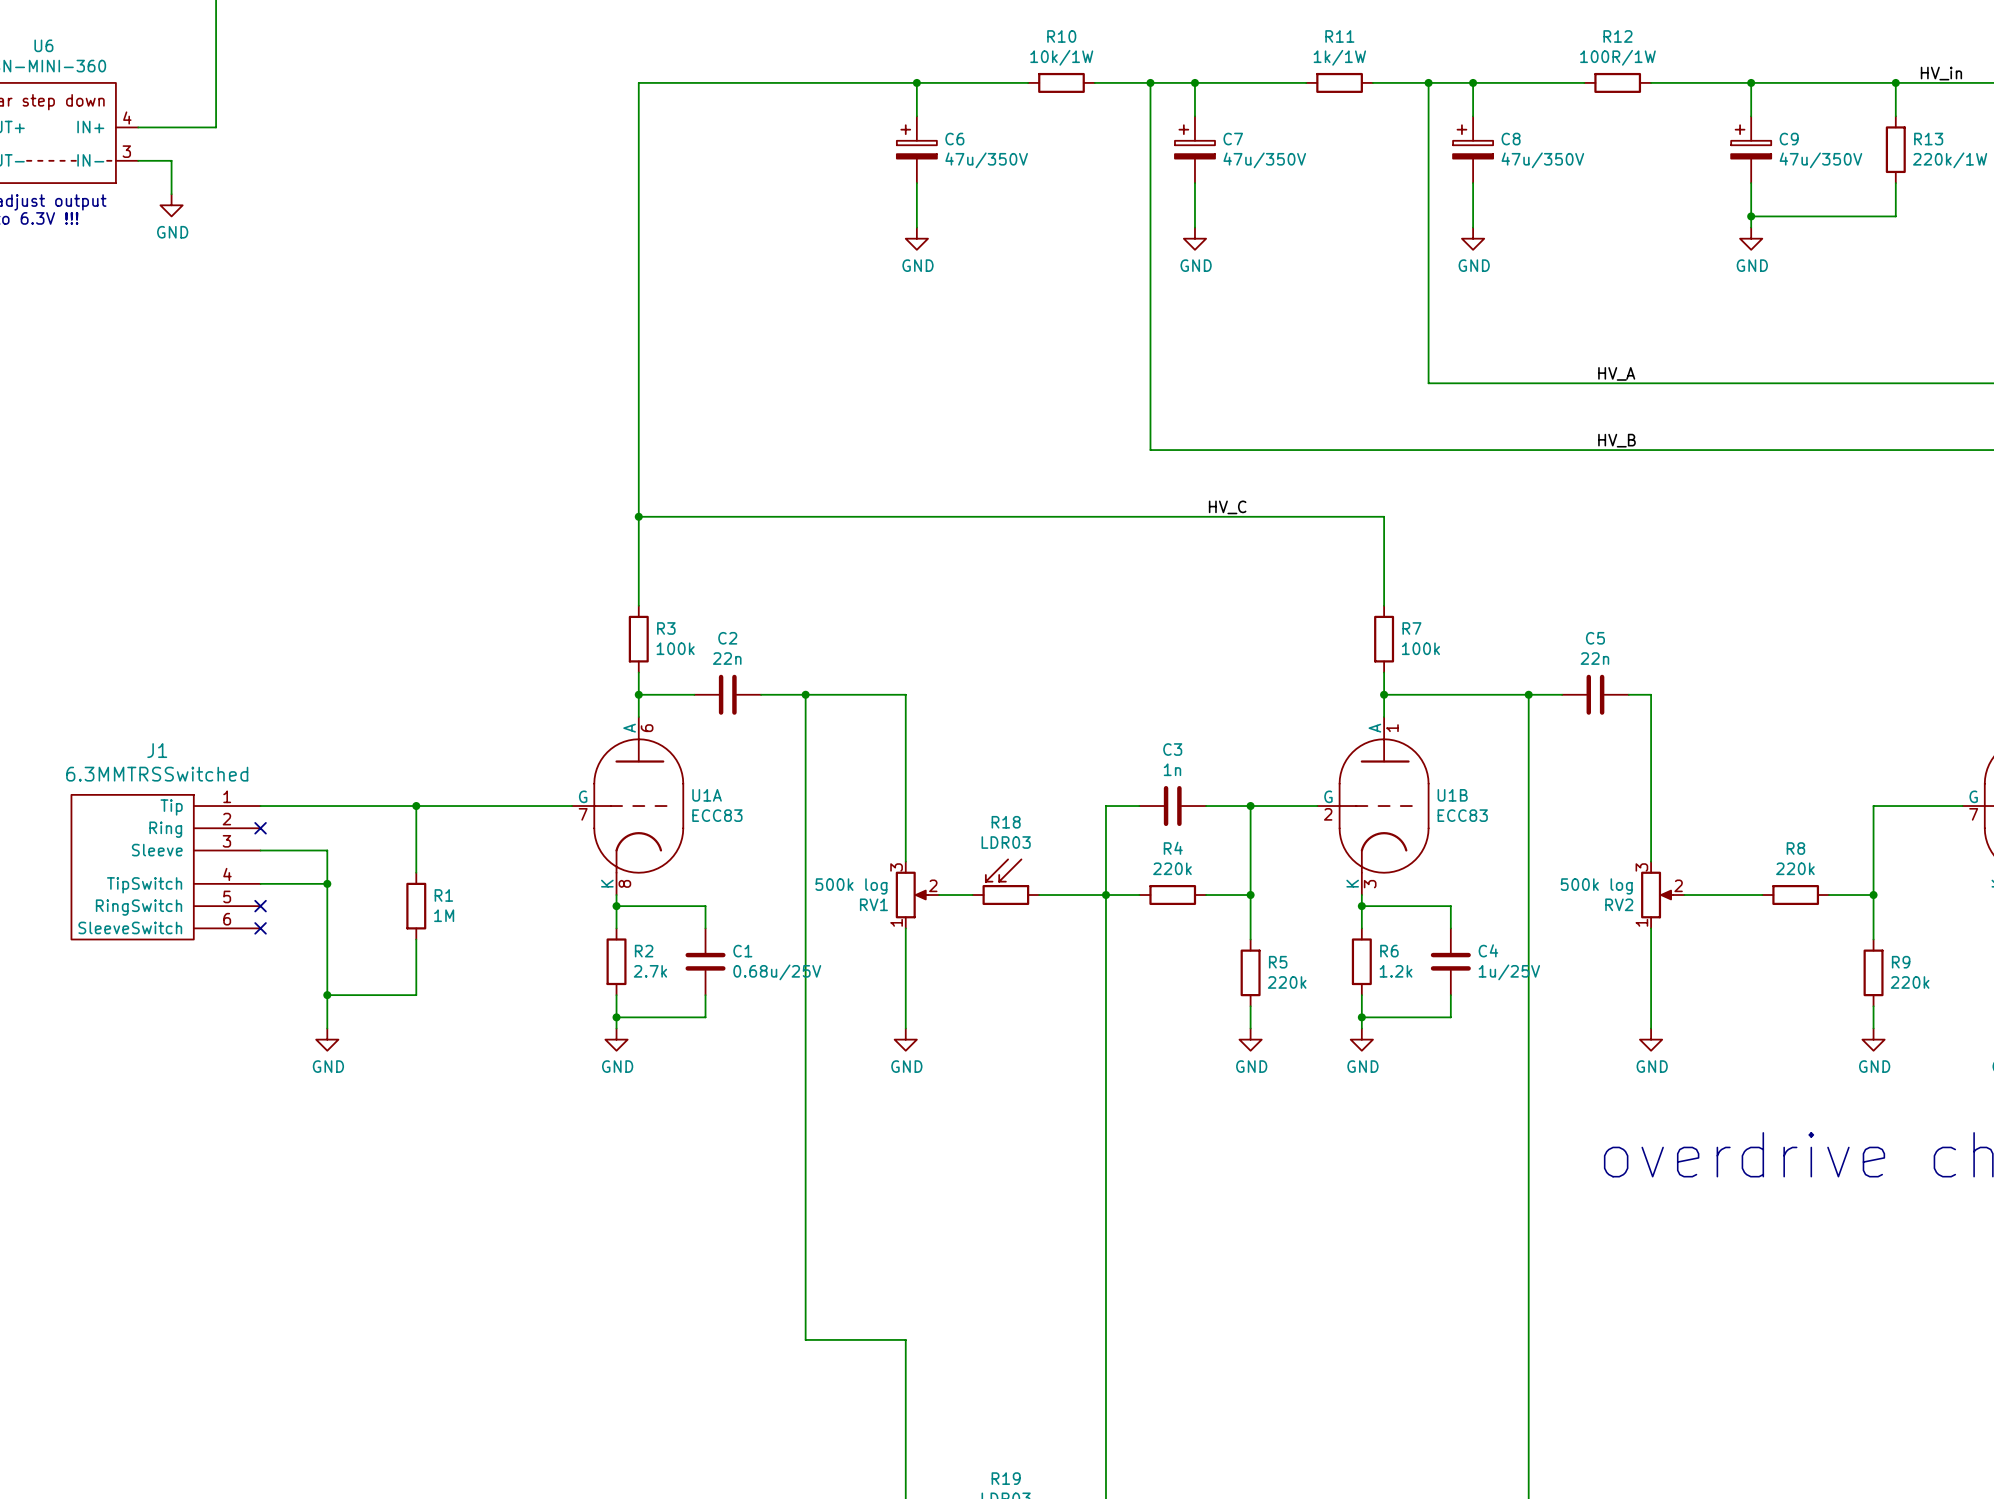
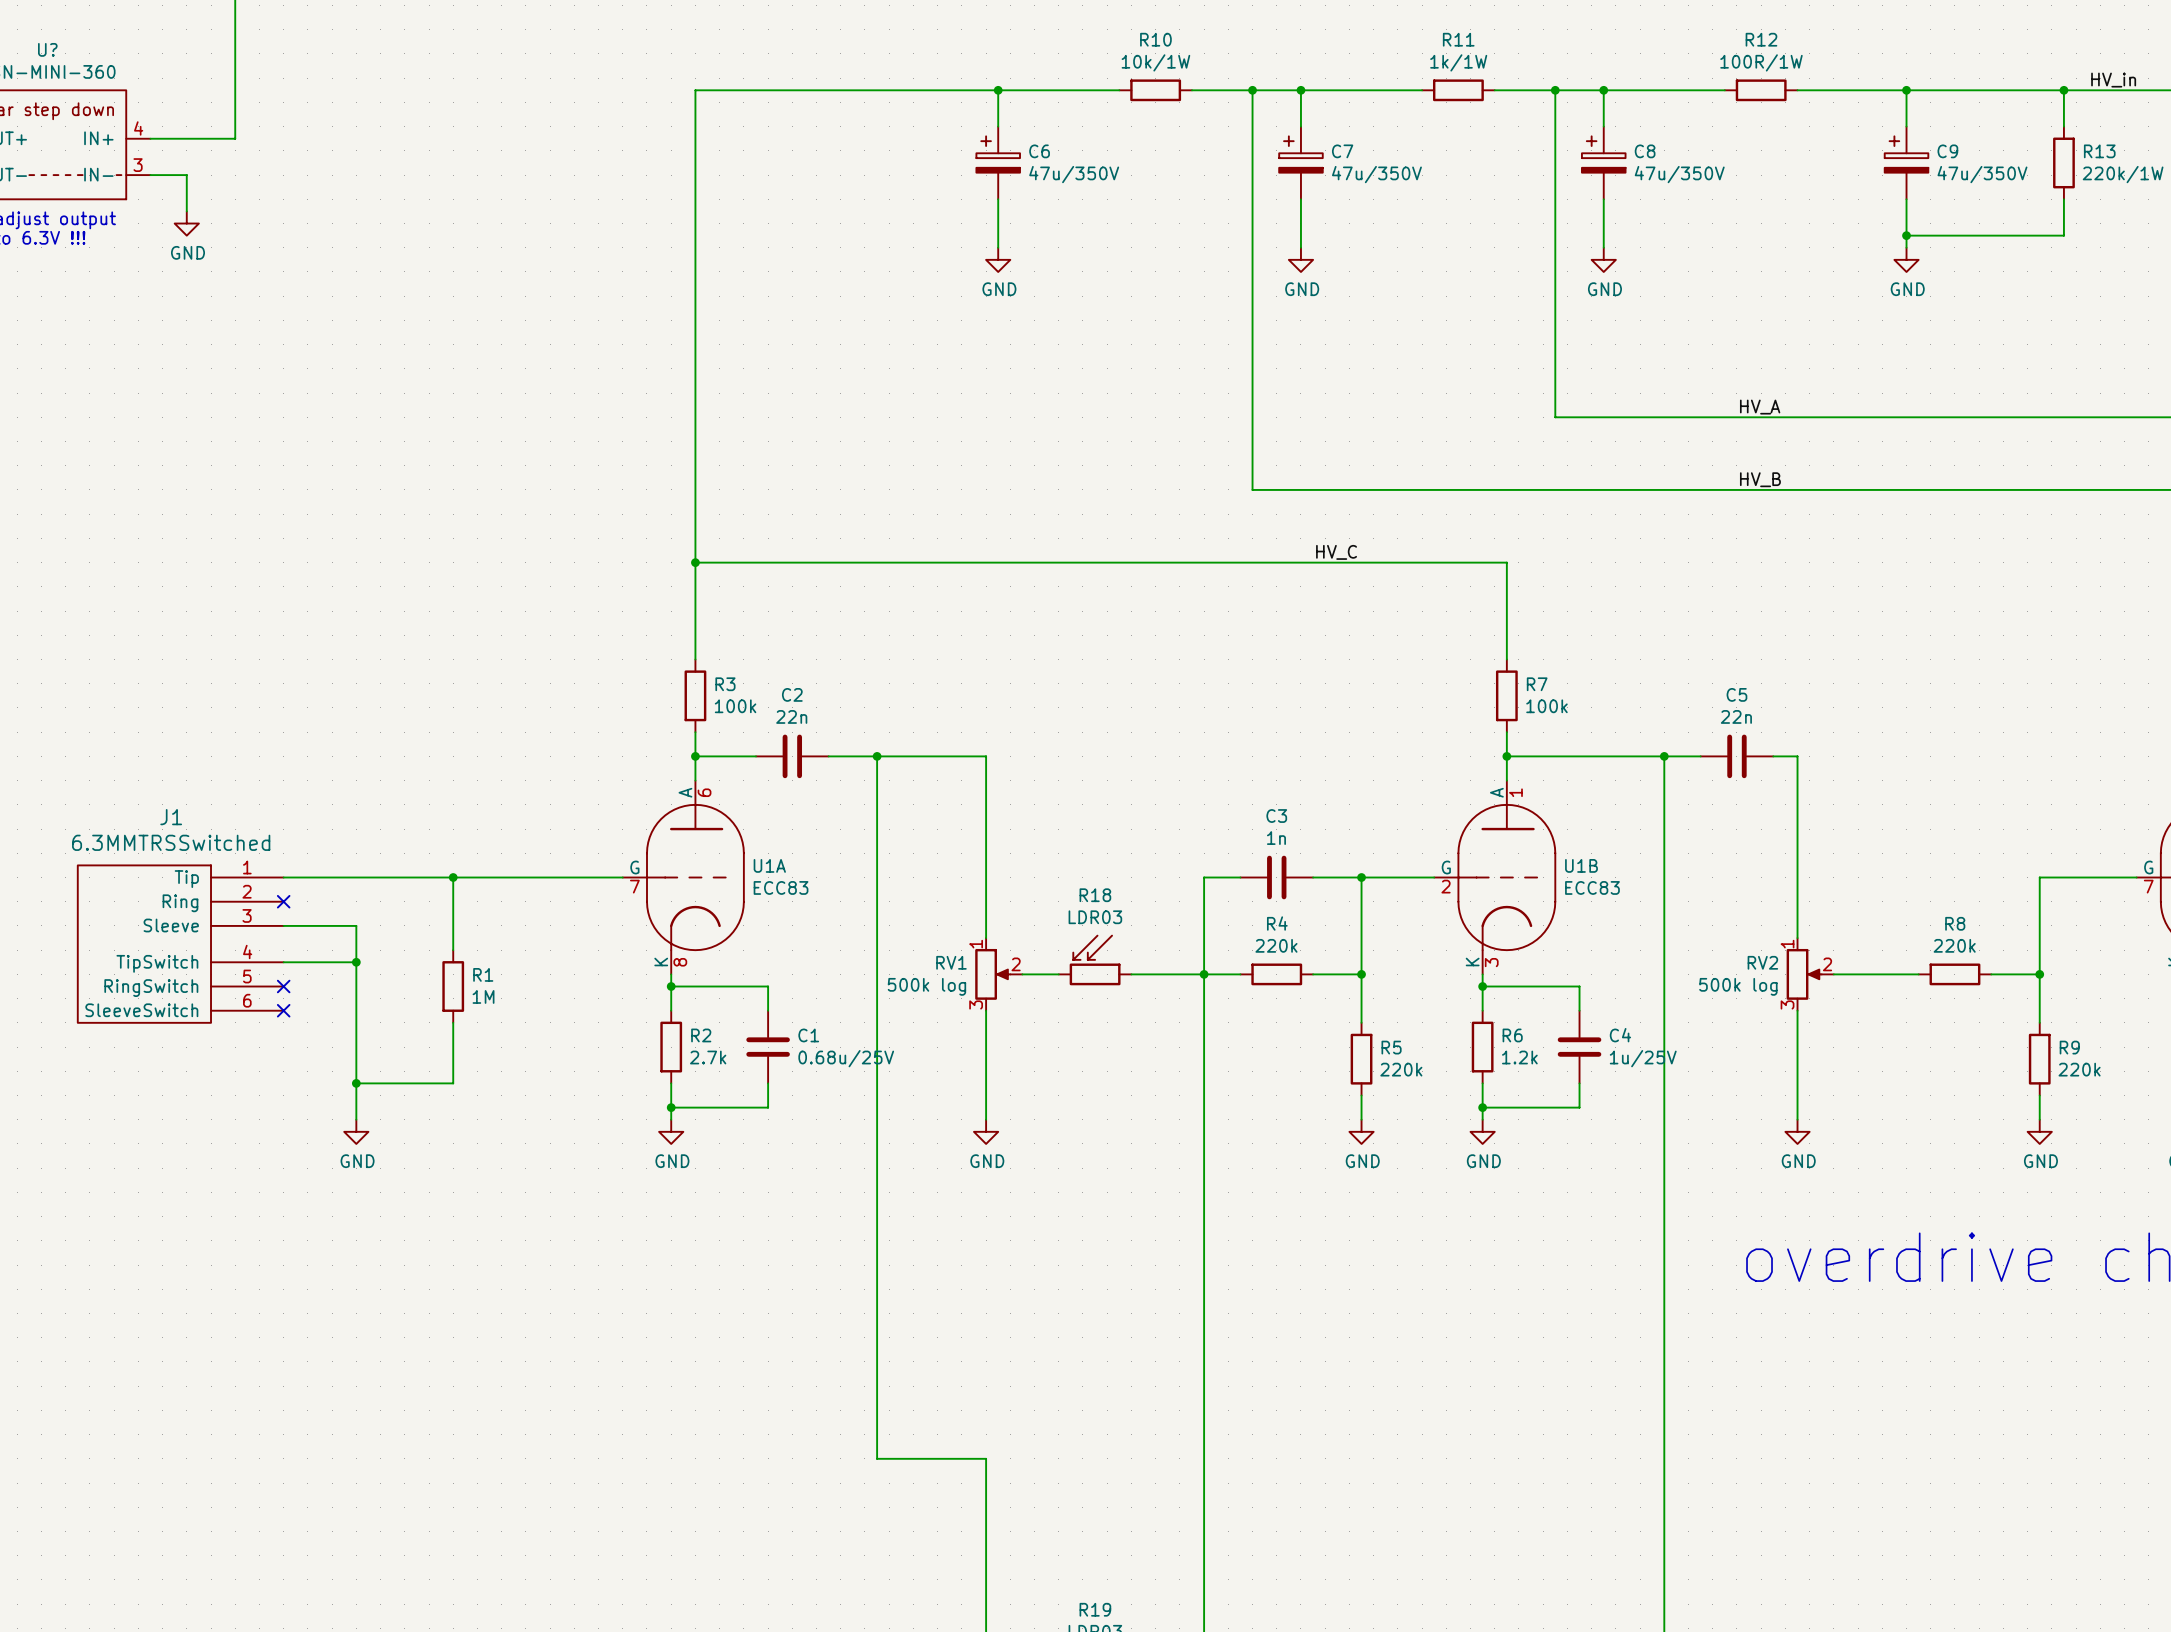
U6 name: U6 (43, 45) -> U? (47, 49)
RV1 flip: as is (911, 895) -> up-down (992, 974)
RV2 flip: as is (1657, 895) -> up-down (1804, 974)

